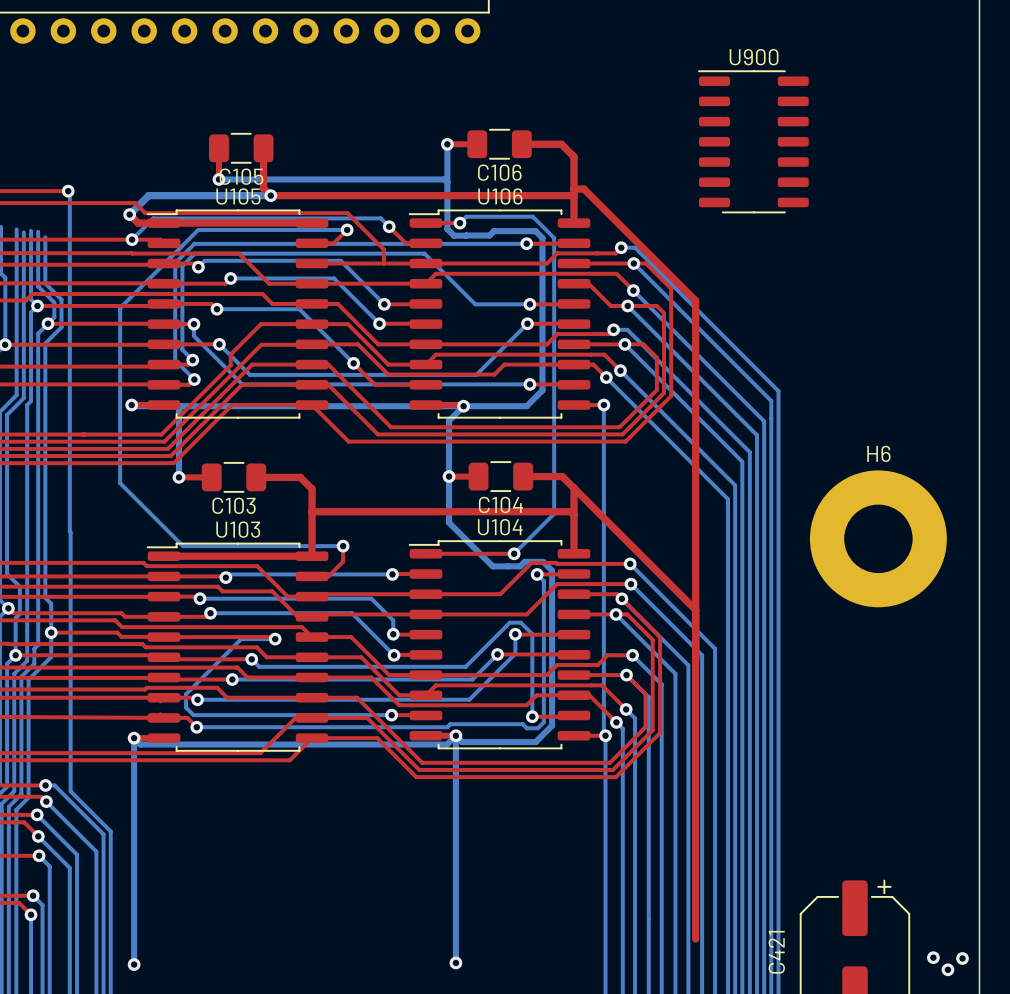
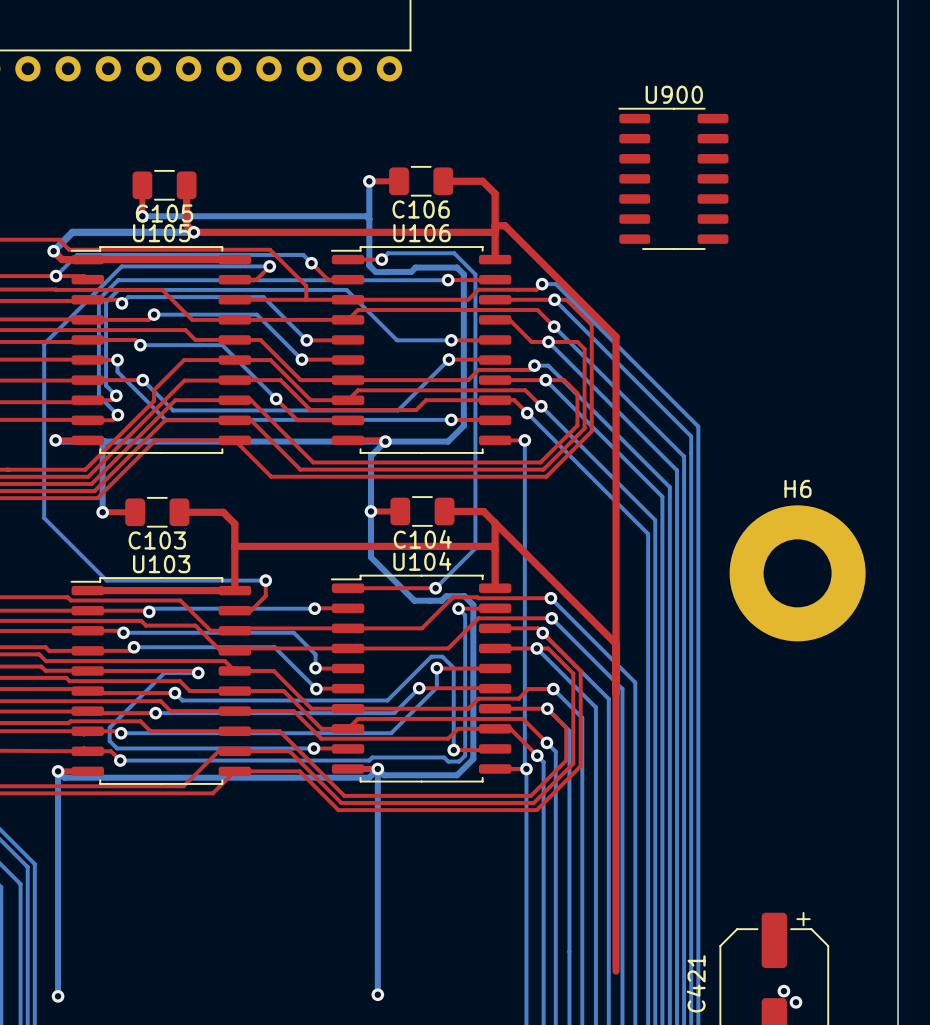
via: (933, 957) -> none
via: (962, 958) -> none
via: none -> (783, 991)
via: (947, 969) -> none
via: none -> (796, 1002)

